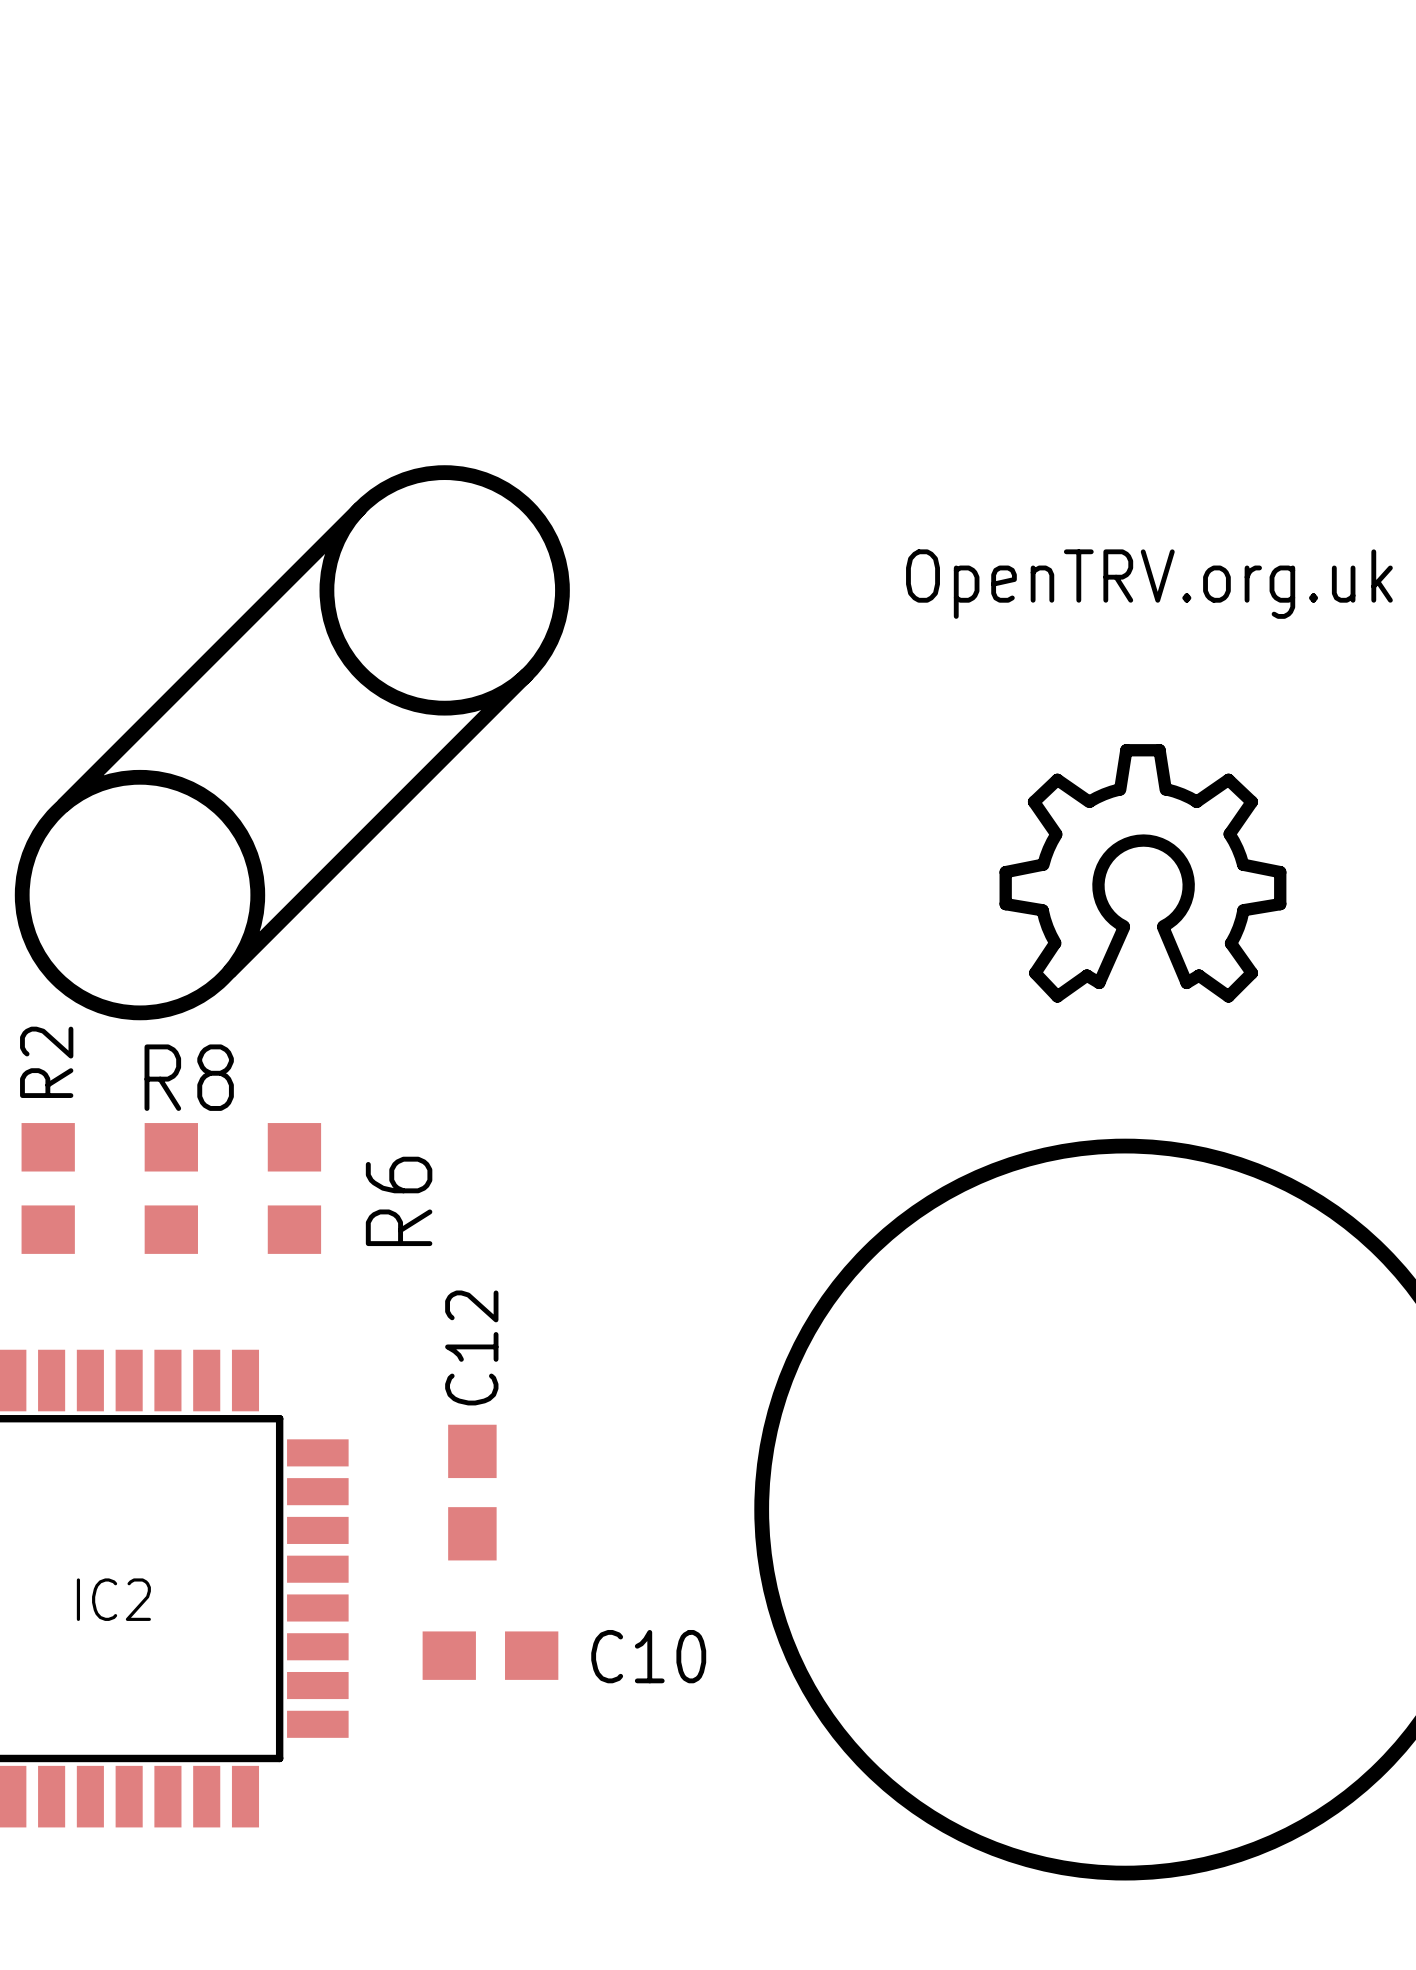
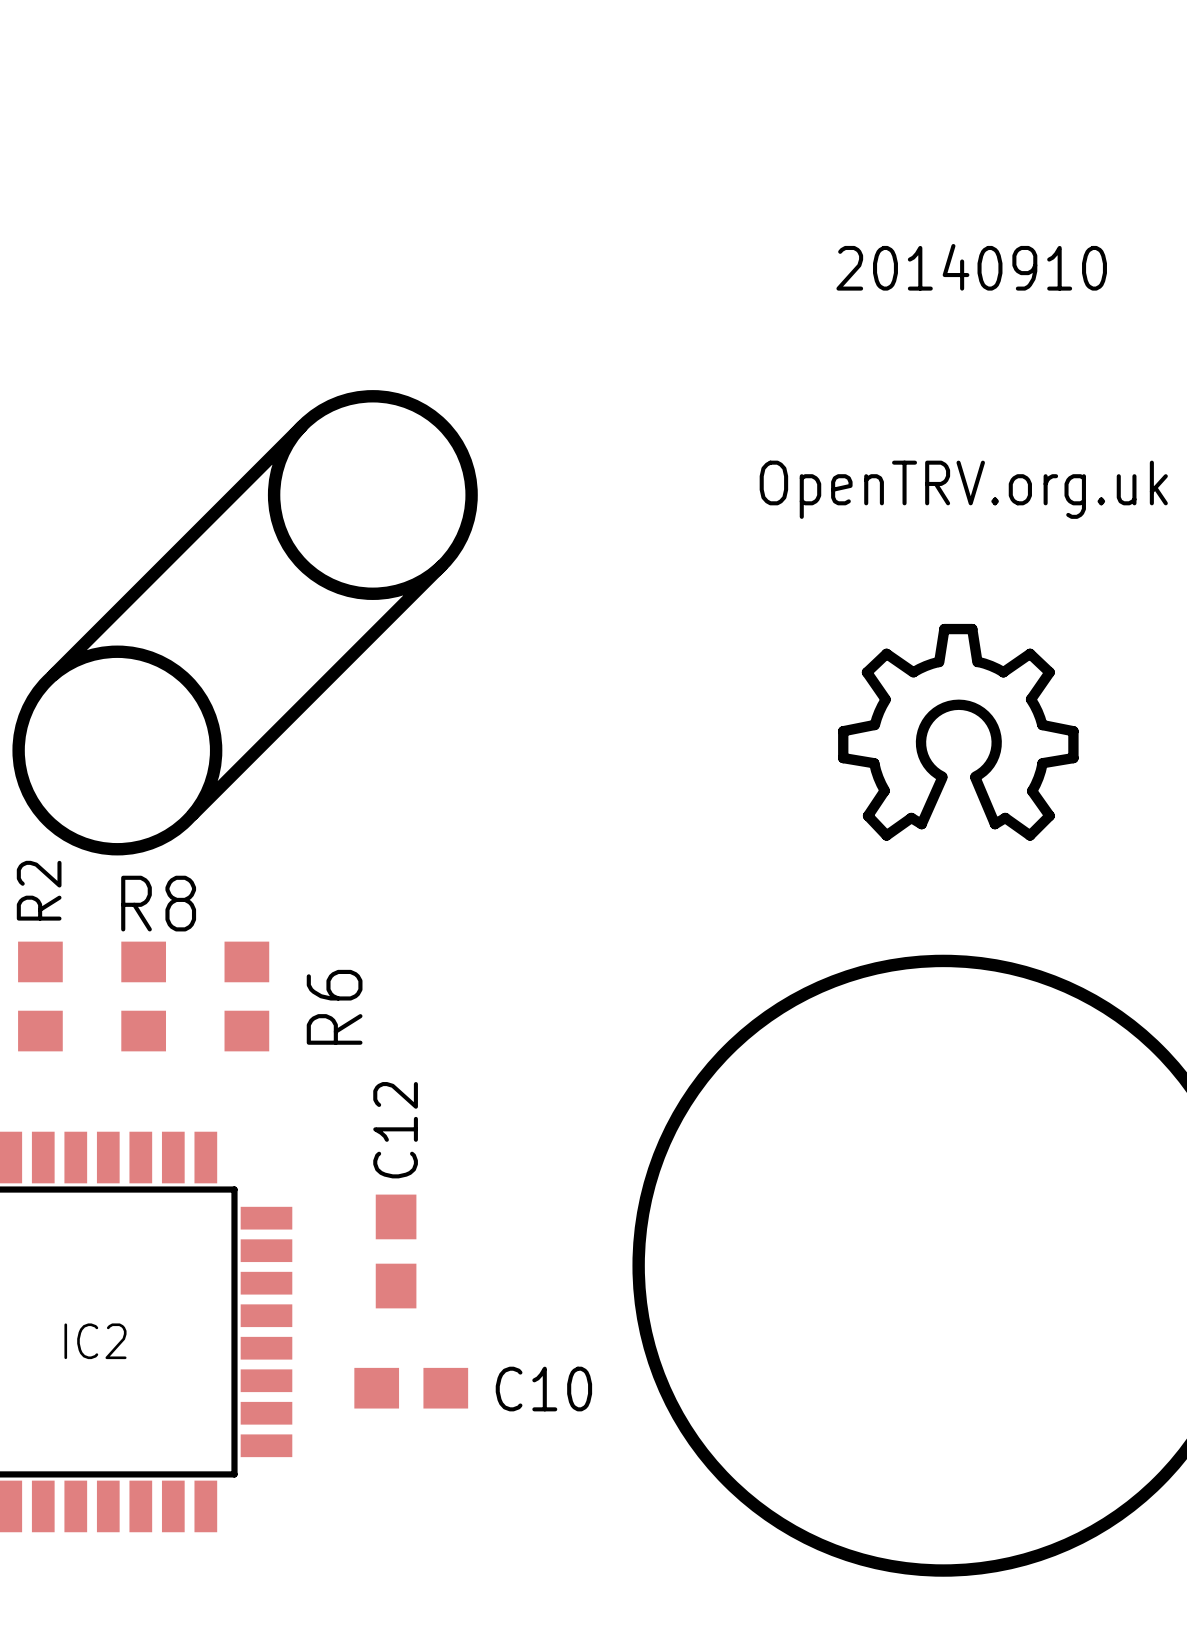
text: none -> 20140910 (971, 267)

